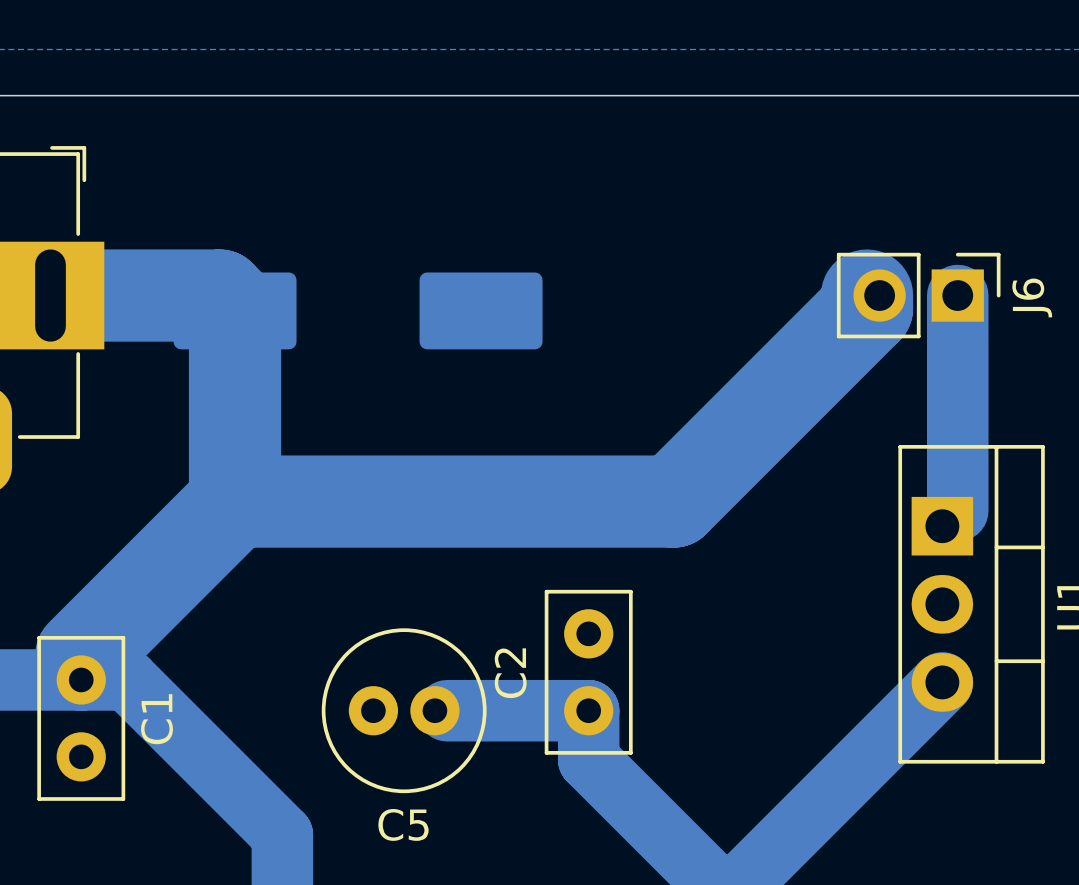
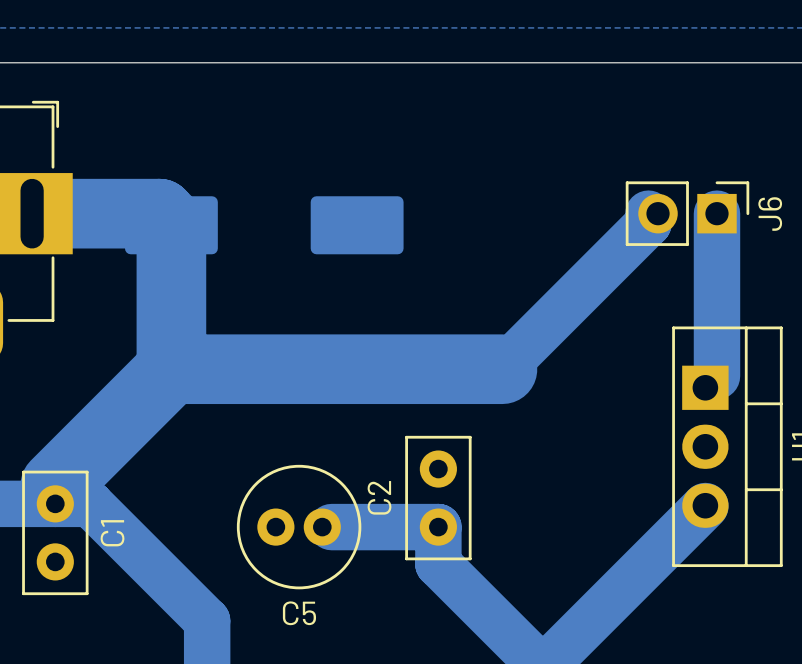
bottom track width: thick (867, 295) (867, 308) (673, 501) -> thin (648, 213) (648, 223) (502, 369)

